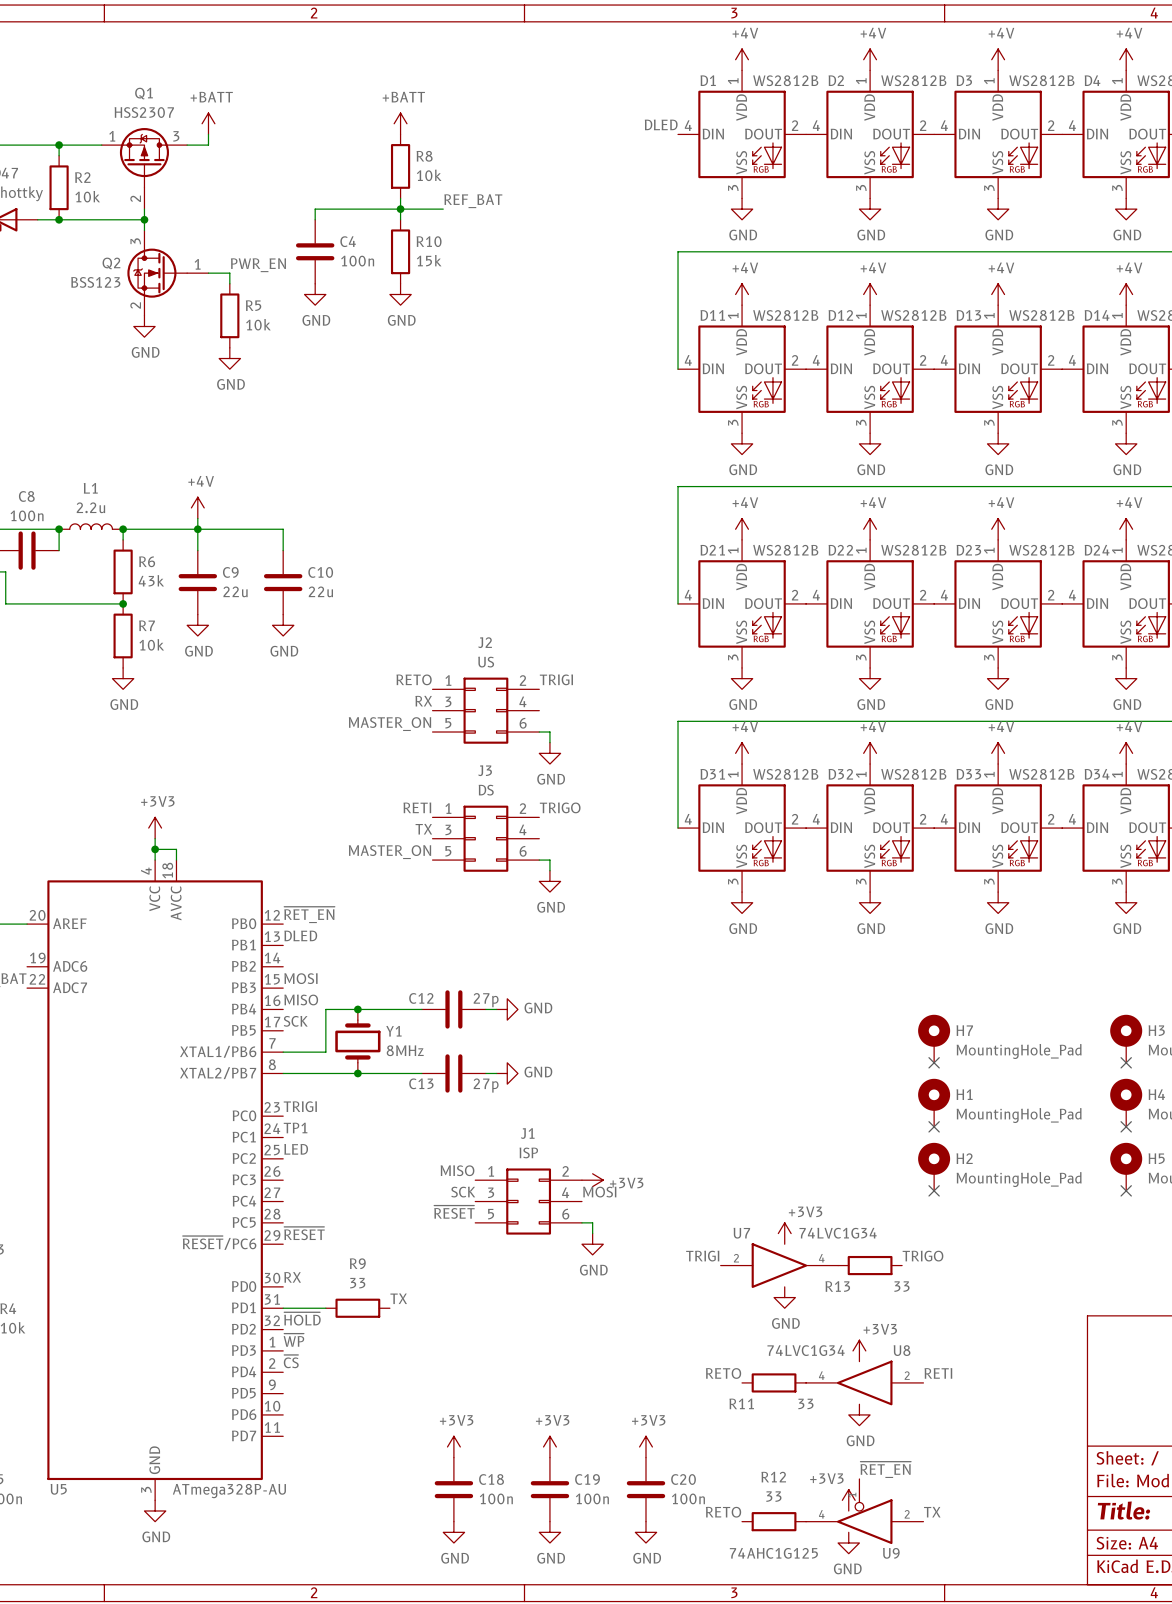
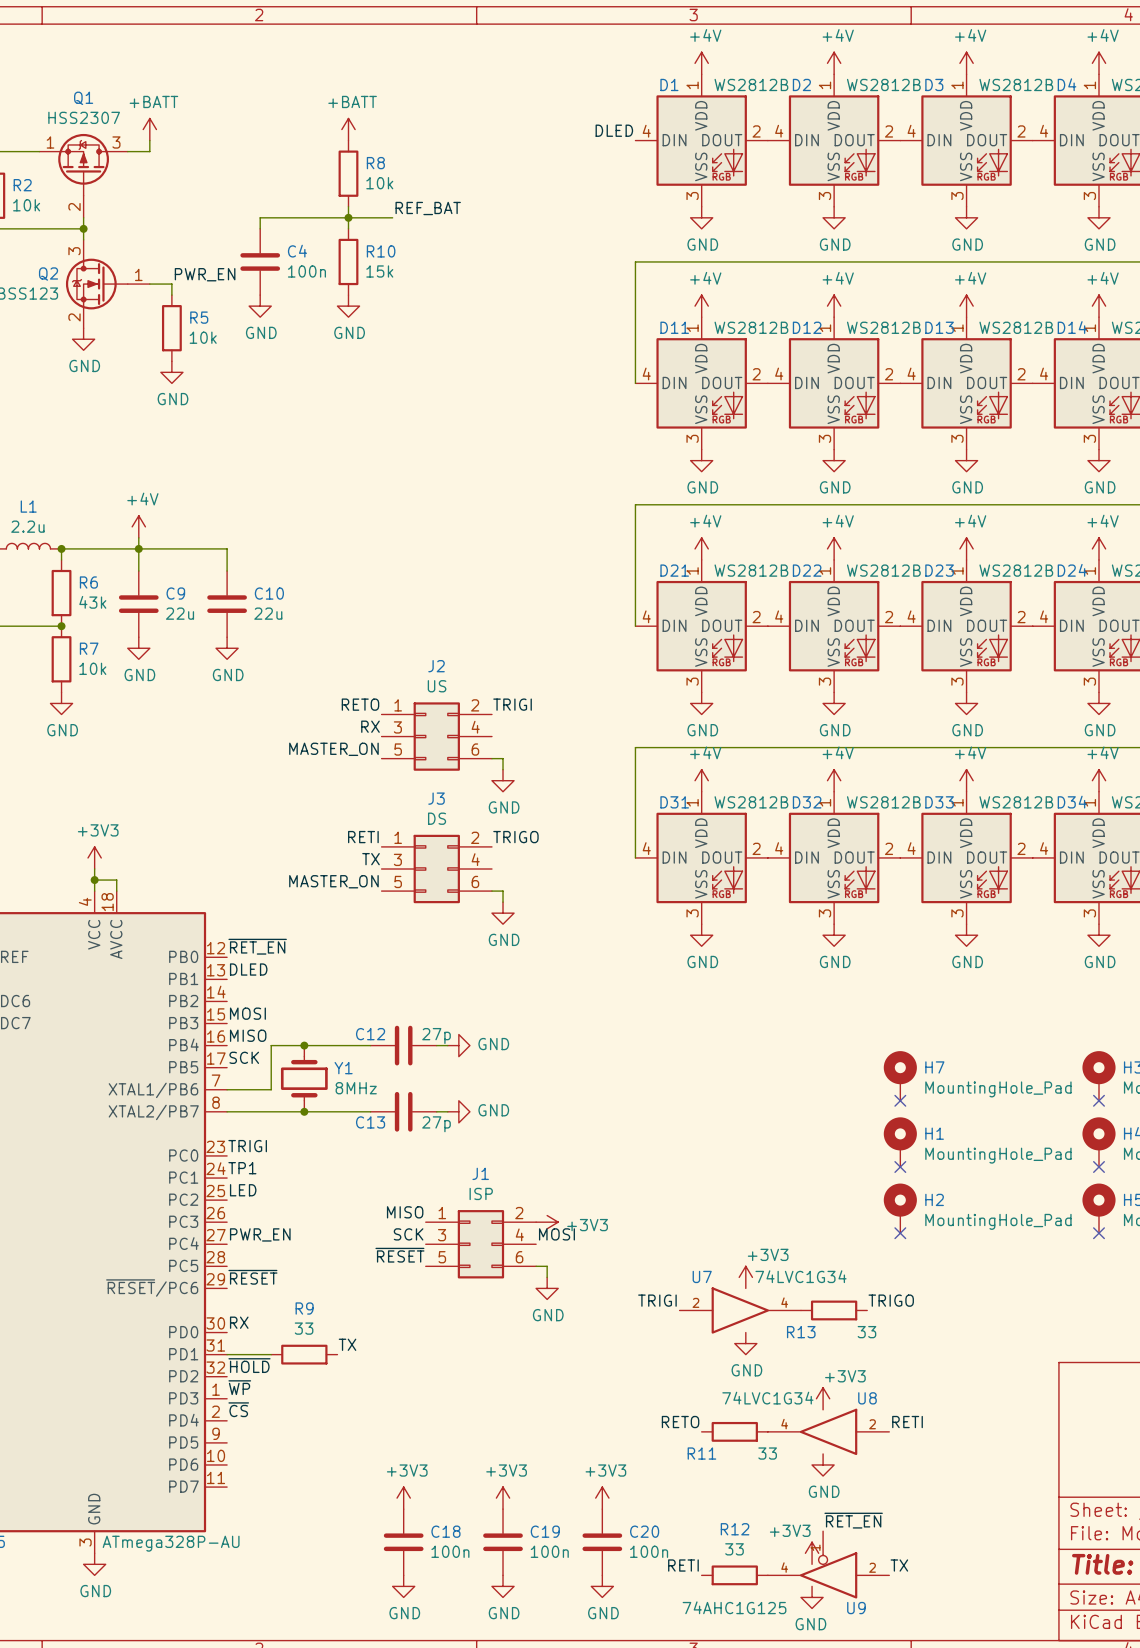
label: none -> PWR_EN (260, 1234)
label: RETO (723, 1512) -> RETI (683, 1565)

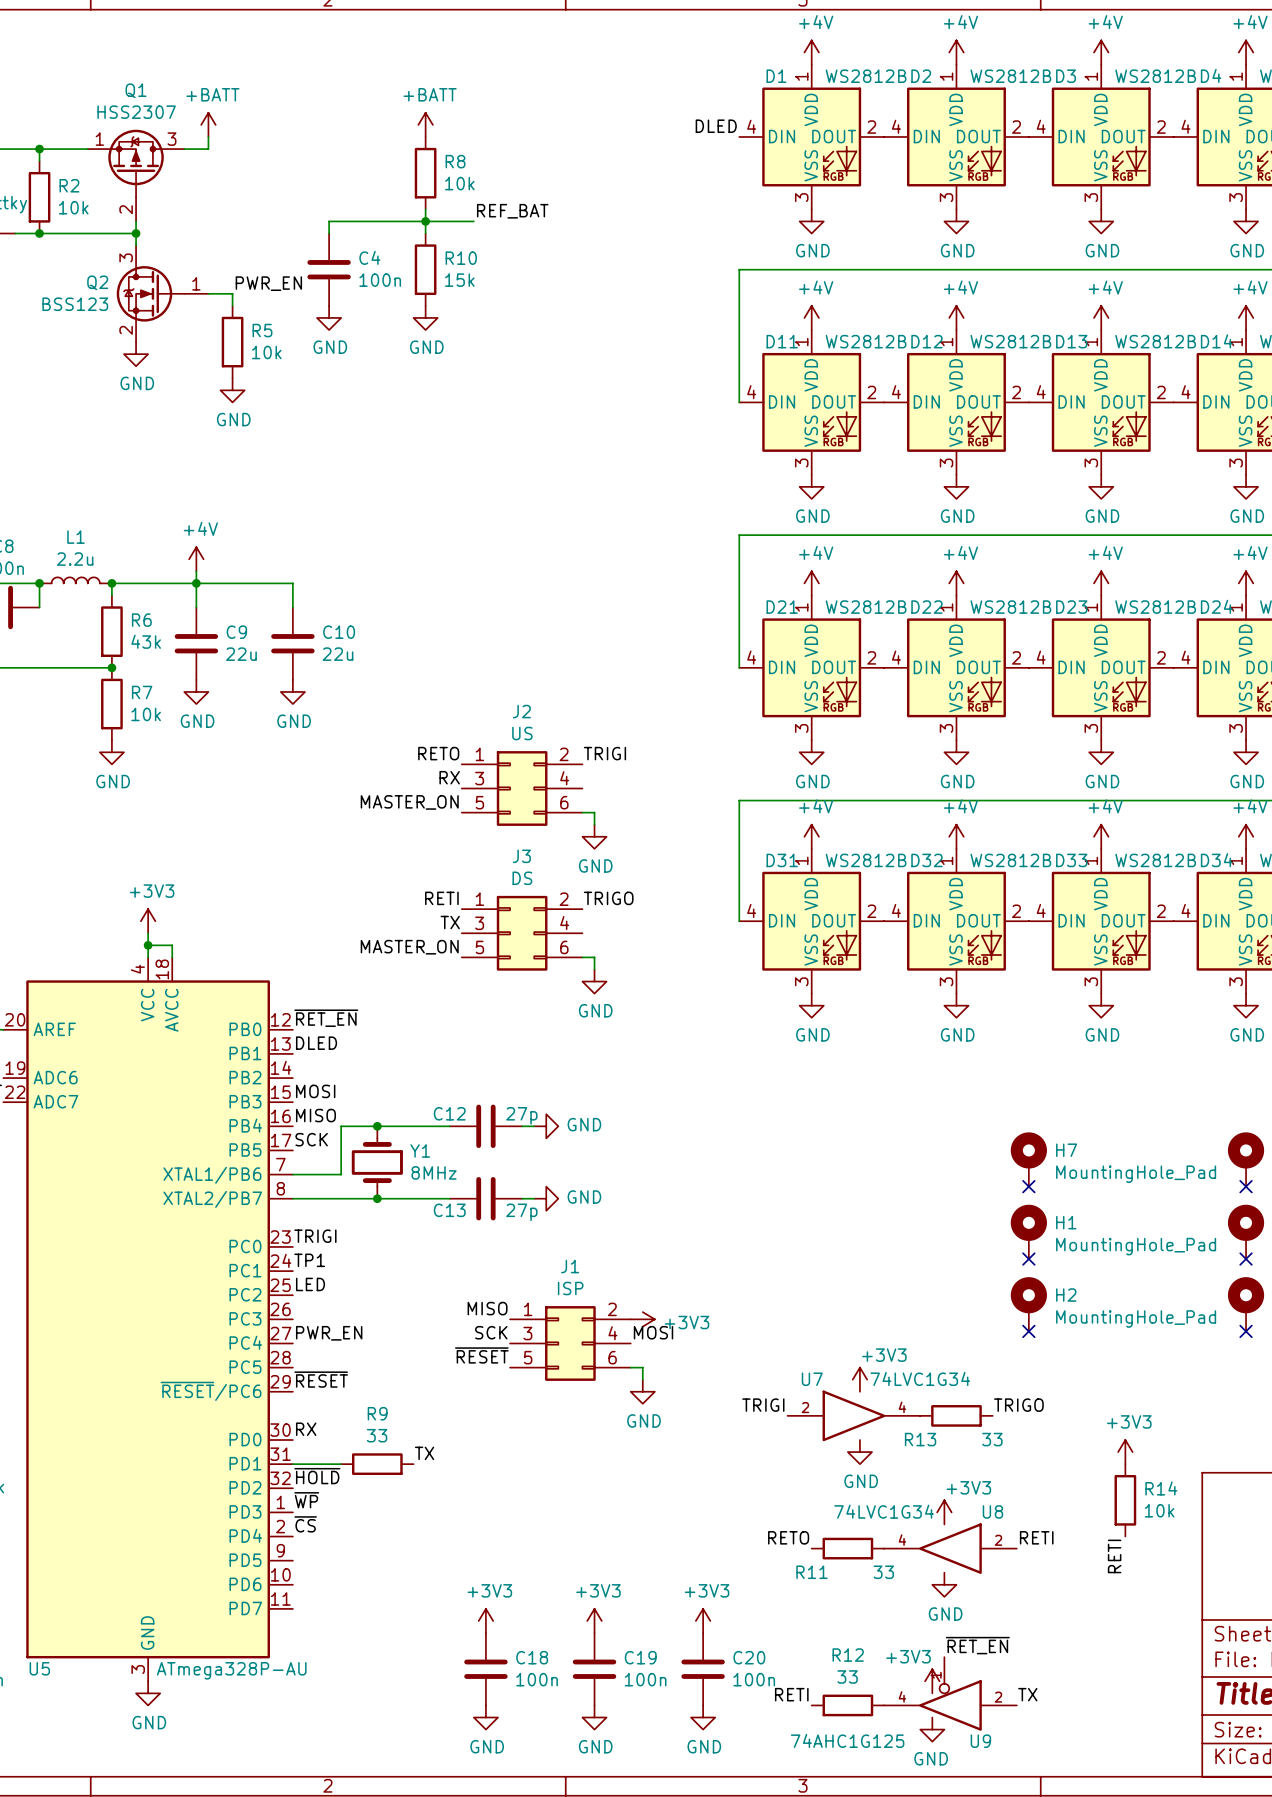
power symbol: none -> +3V3 (1125, 1452)
R14: none -> 10k (1125, 1500)
label: none -> RETI (1114, 1556)

